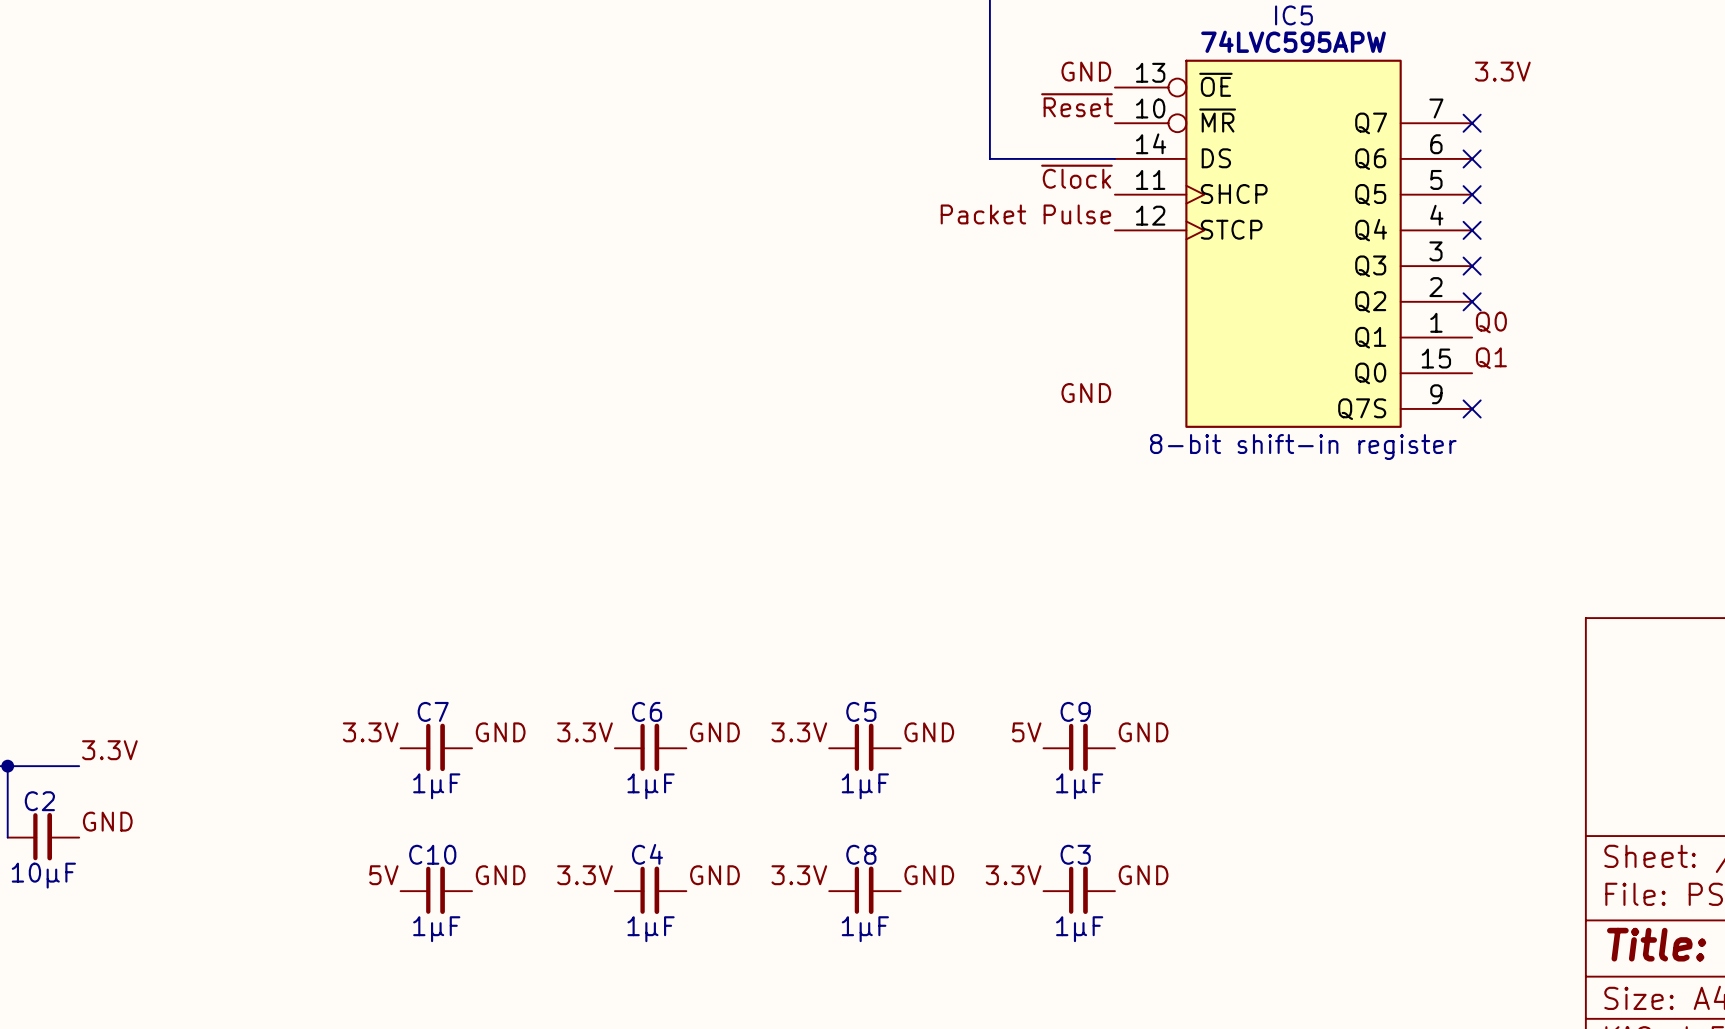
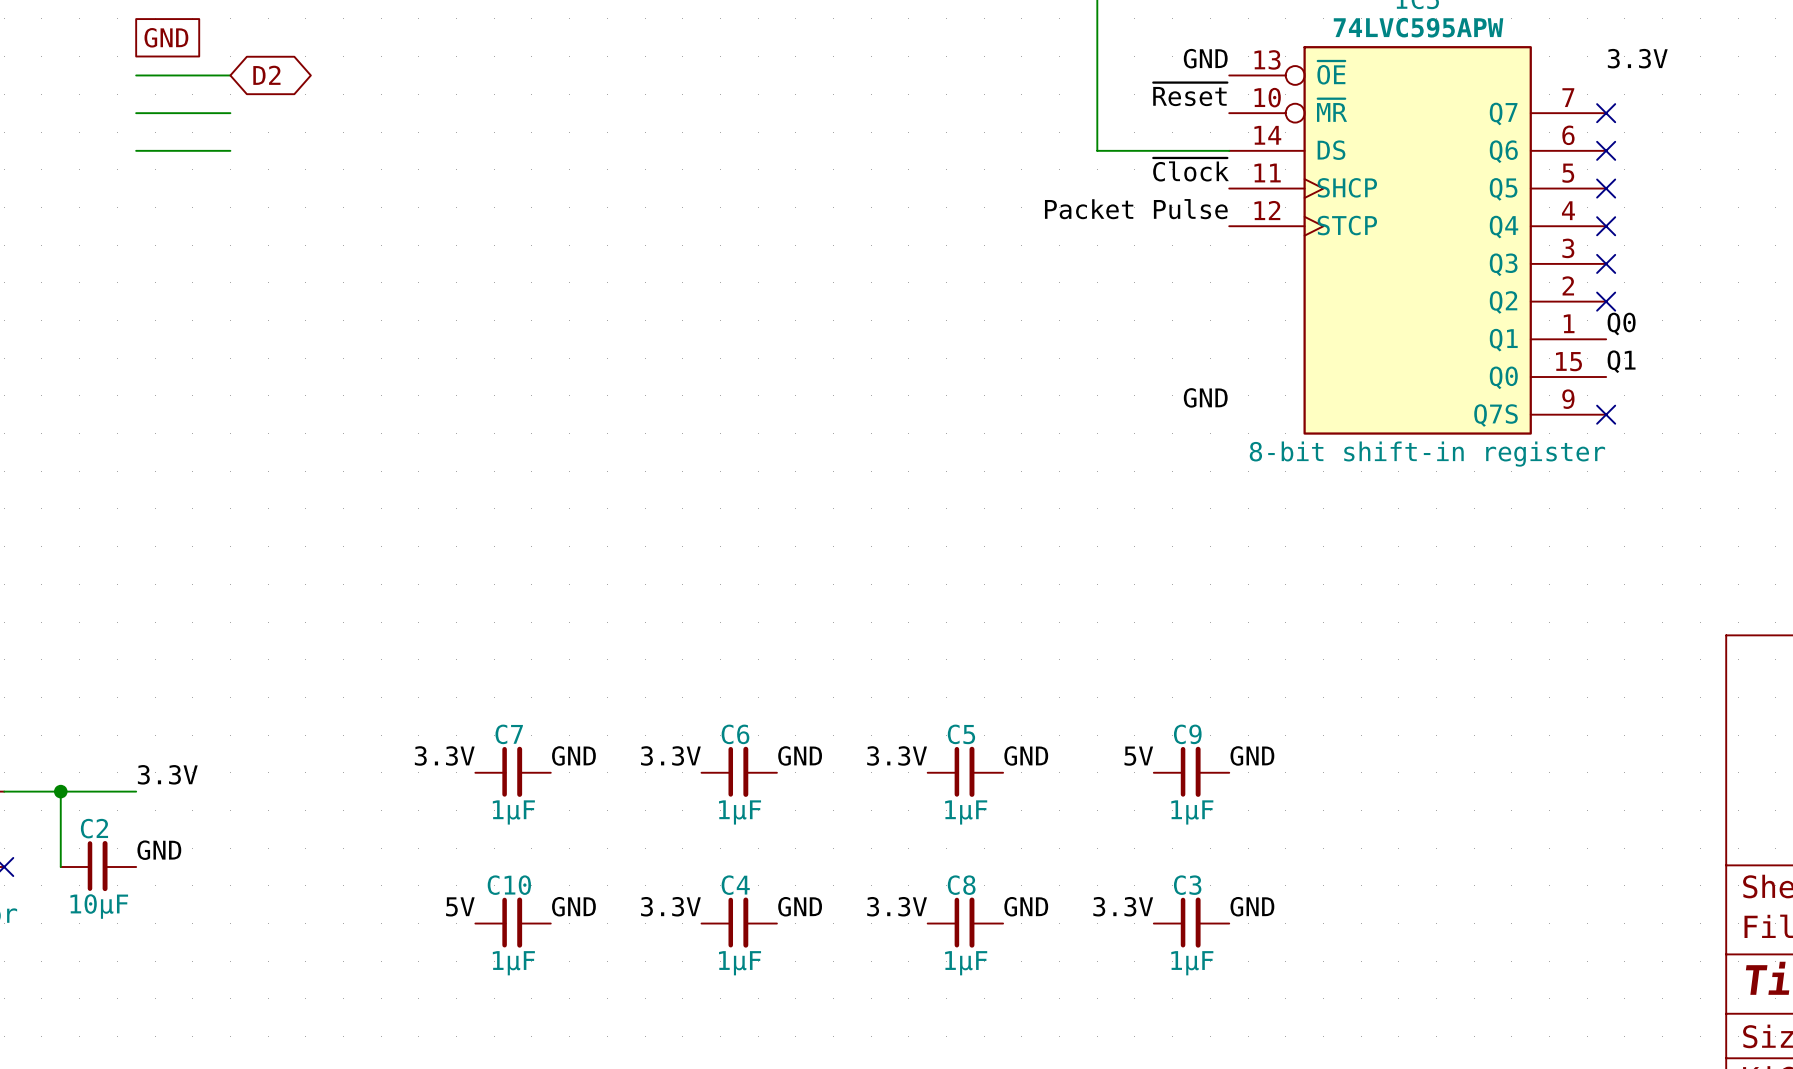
global label: none -> GND (166, 37)
wire: none -> (136, 75) (230, 75)
global label: none -> D2 (266, 75)
wire: none -> (136, 113) (230, 113)
wire: none -> (136, 150) (230, 150)

